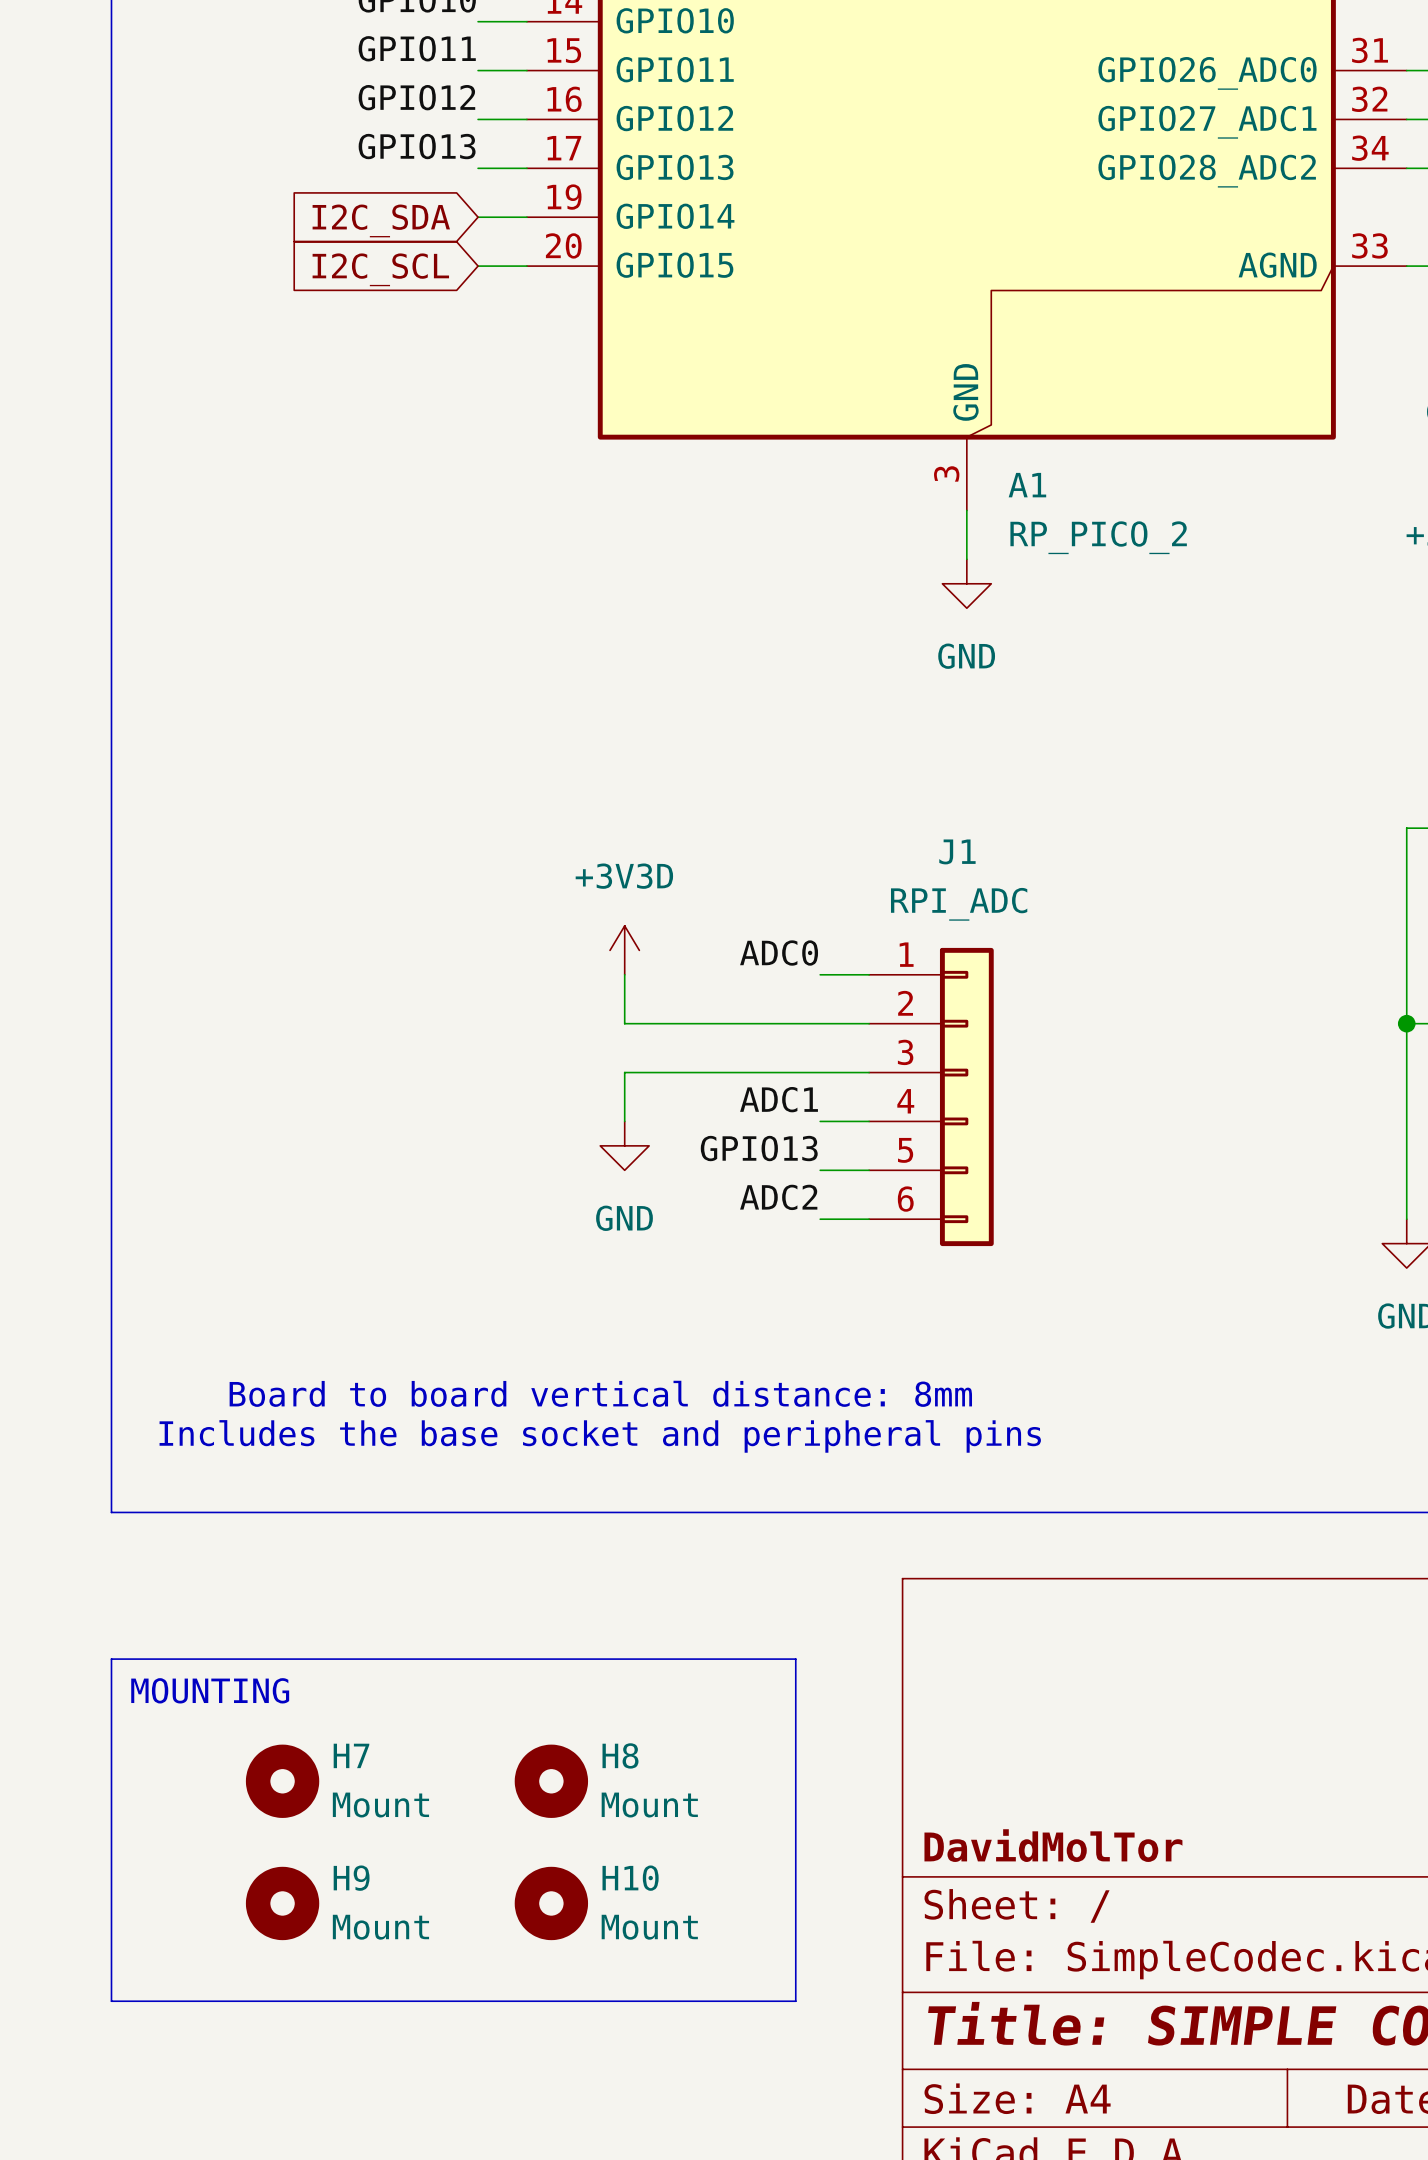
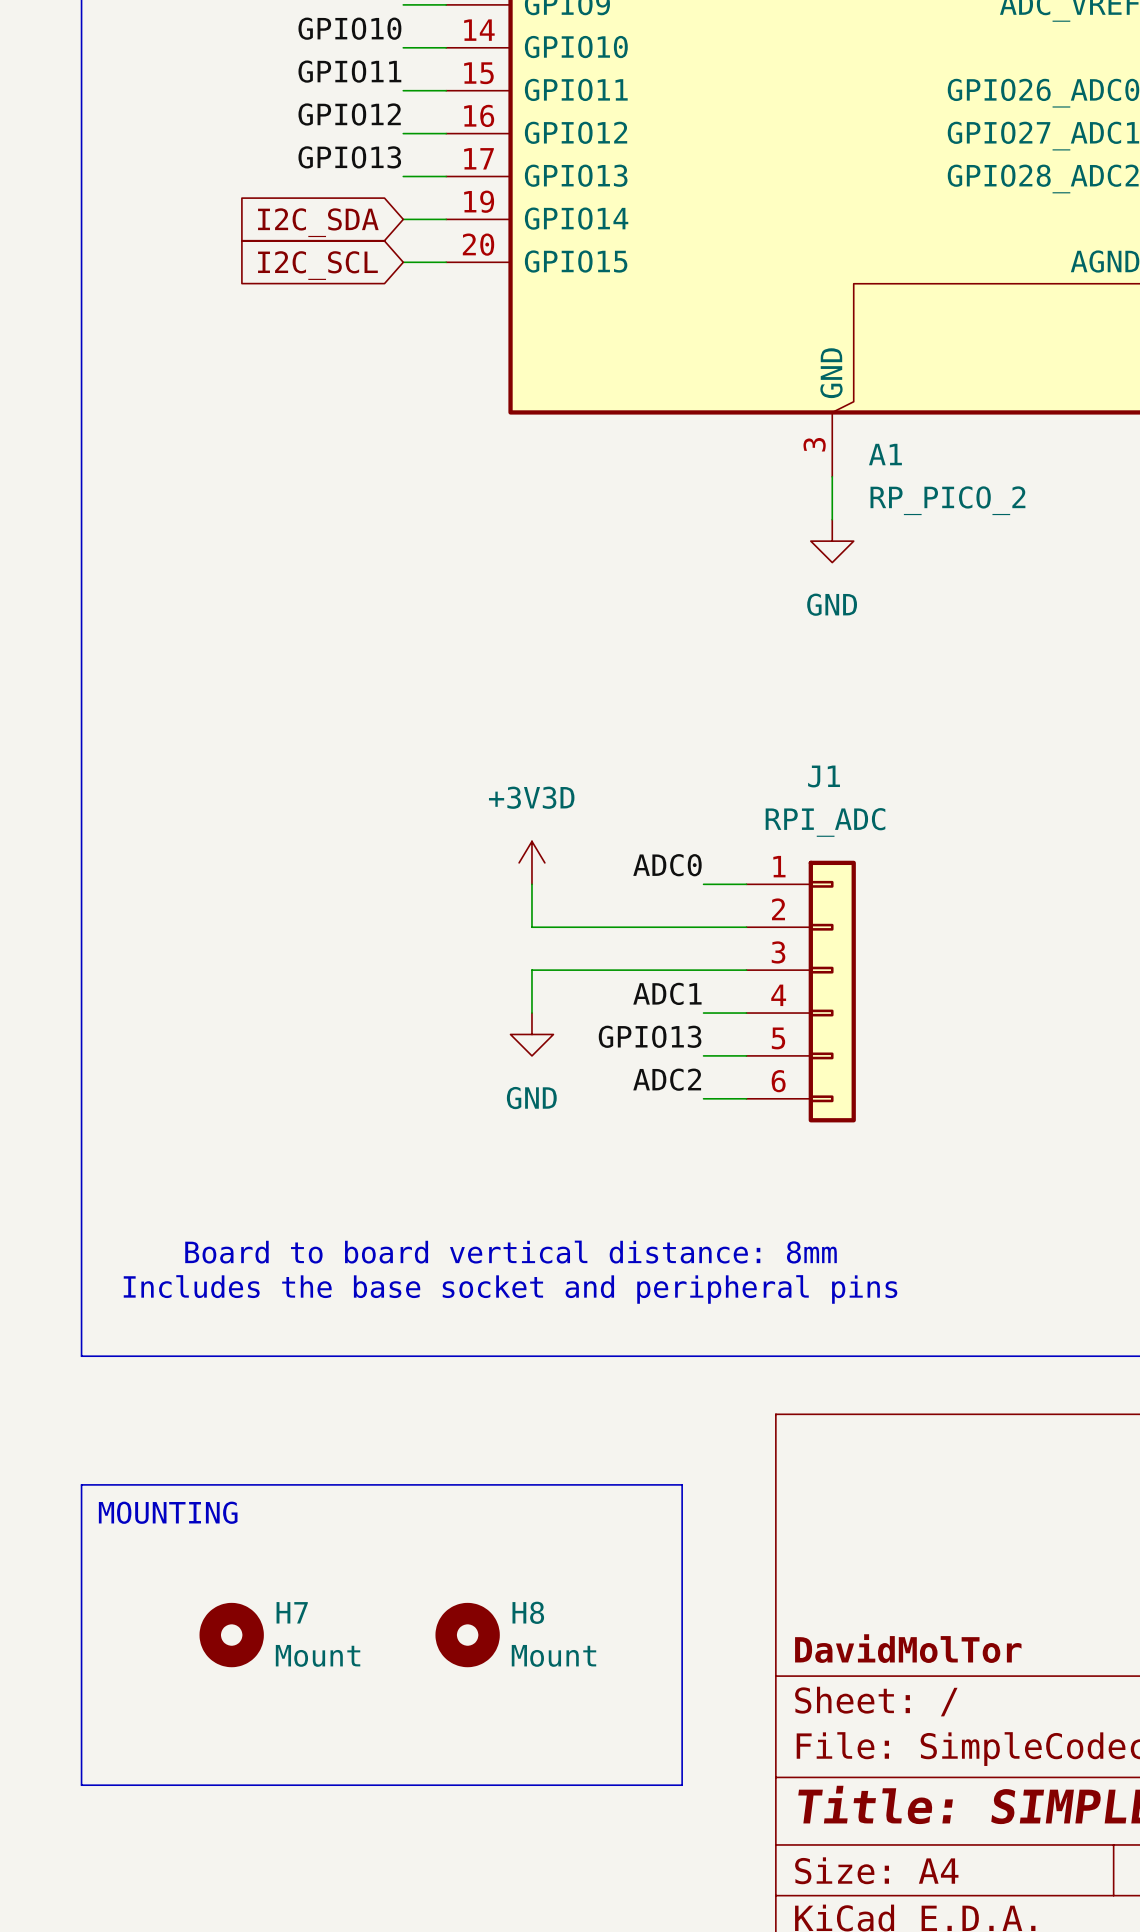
H7 position: (282, 1781) -> (231, 1635)
H8 position: (551, 1781) -> (467, 1635)
H9: Mount (282, 1903) -> none
H10: Mount (551, 1903) -> none

